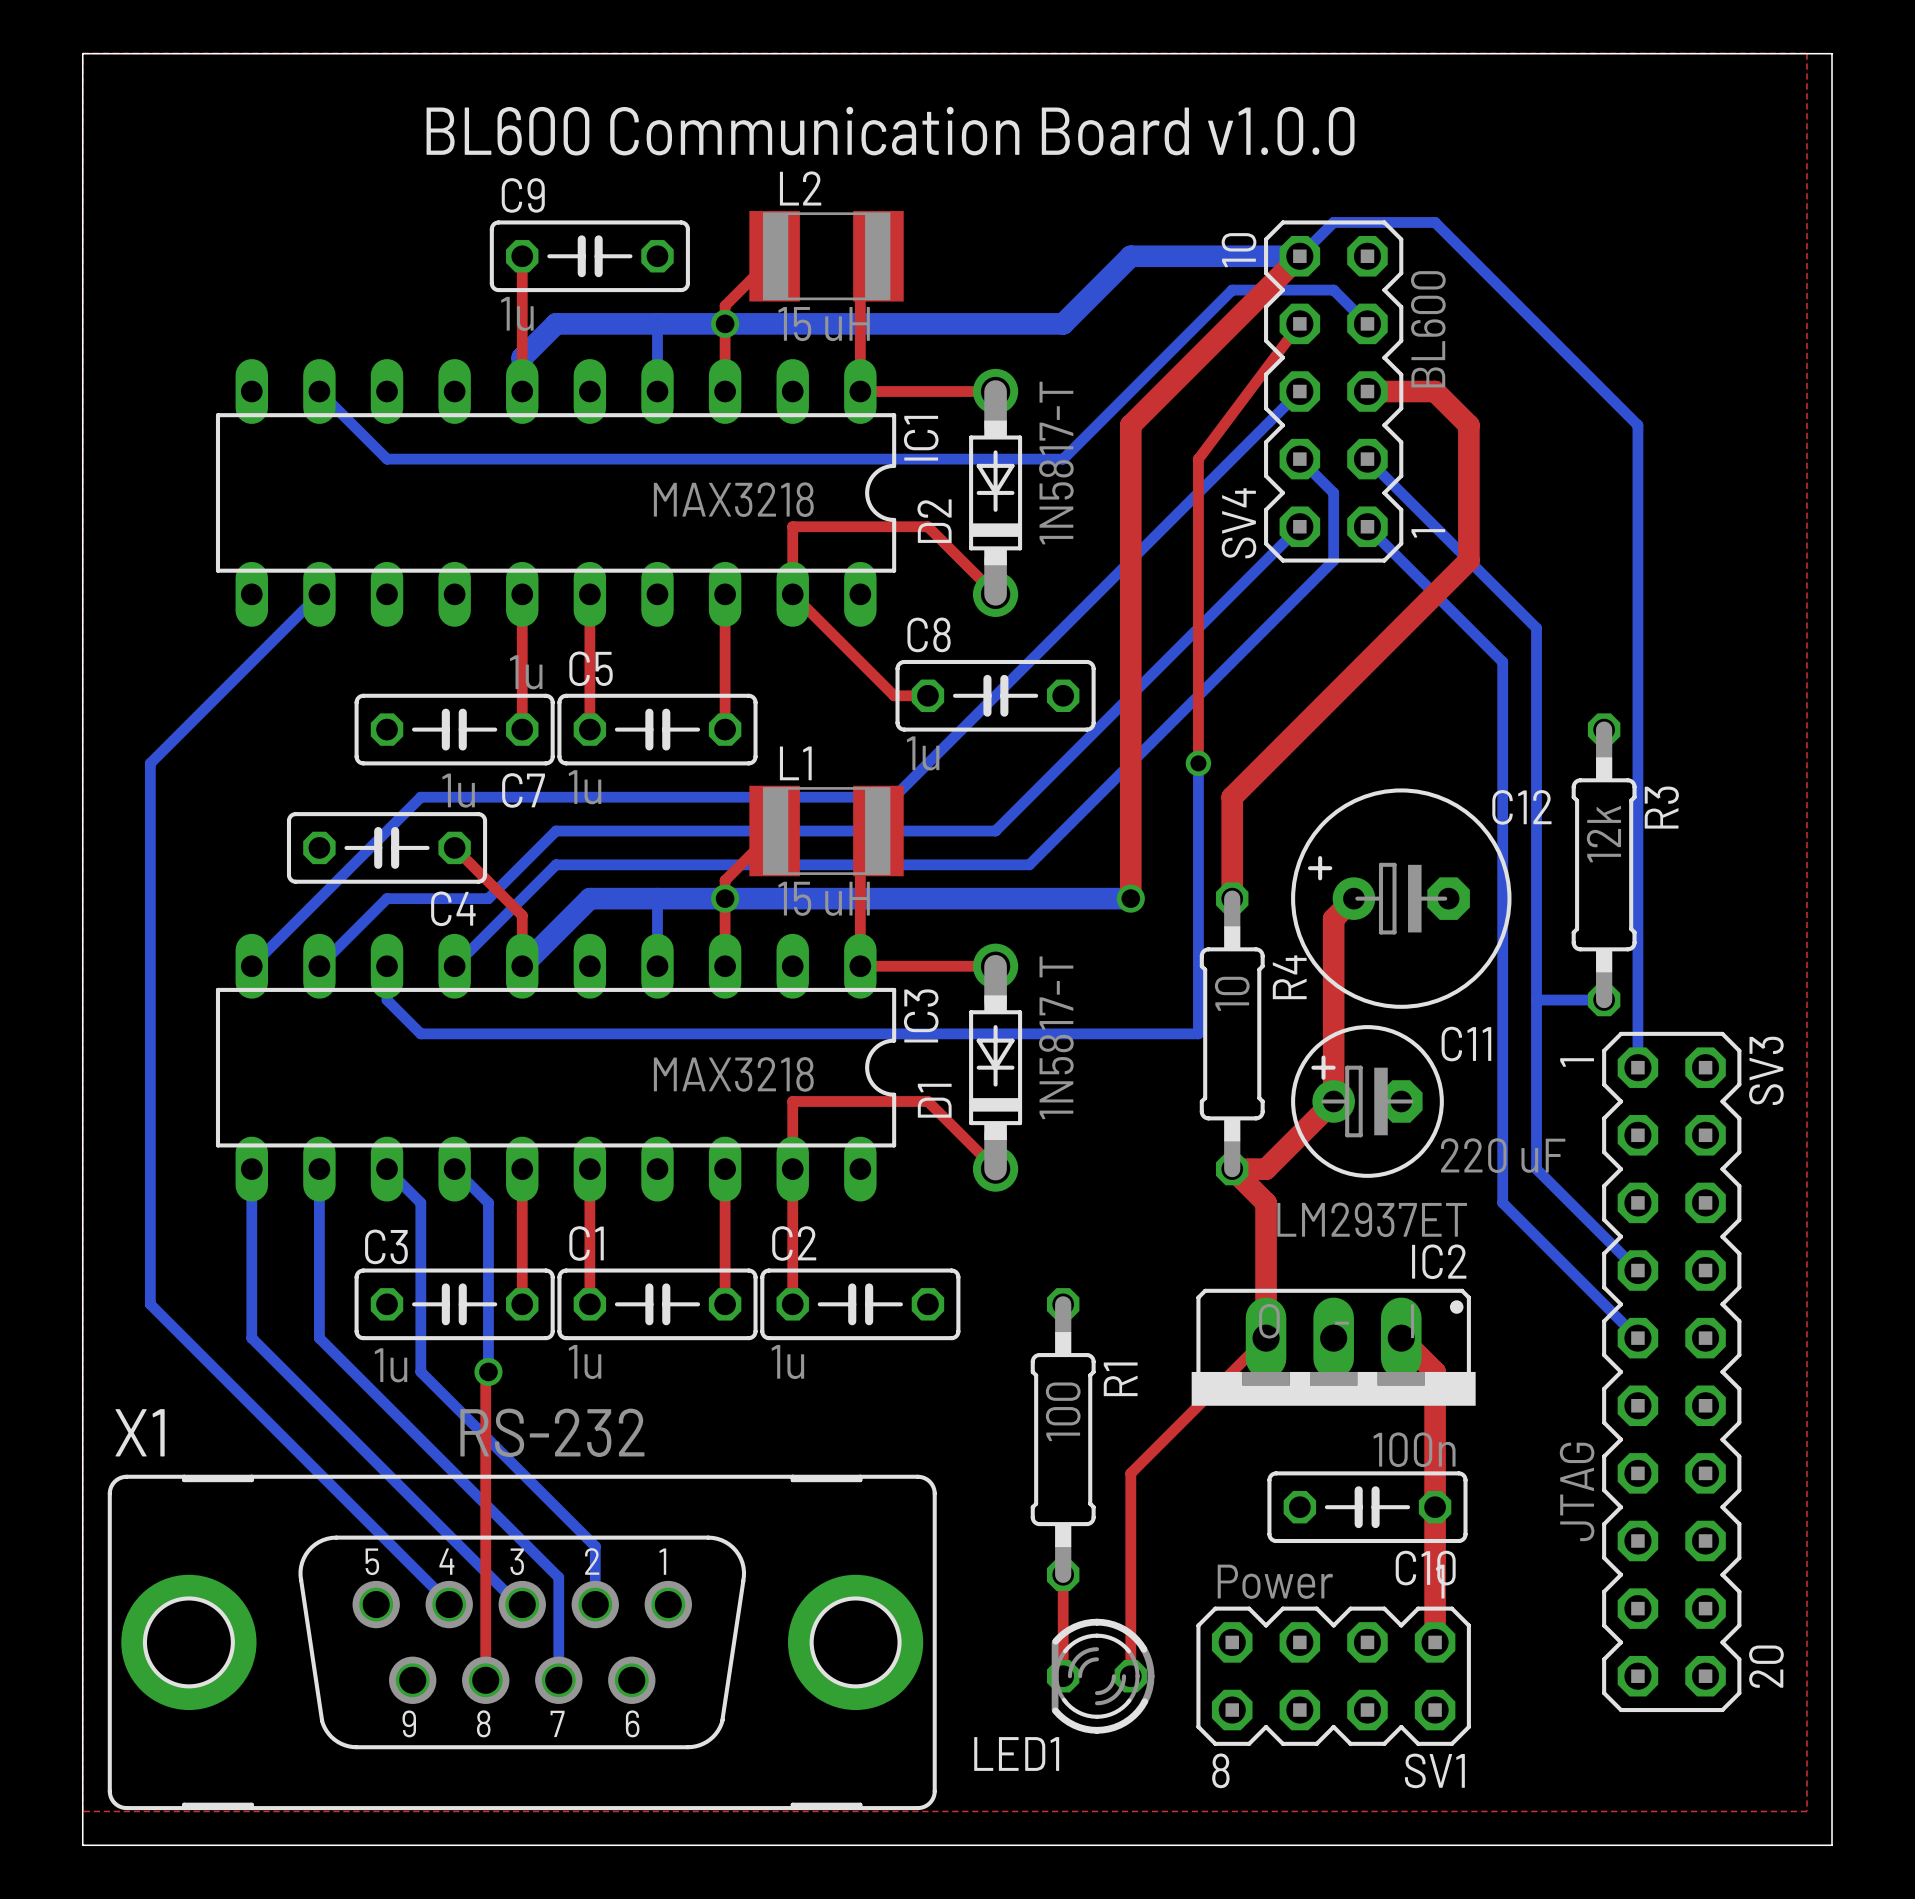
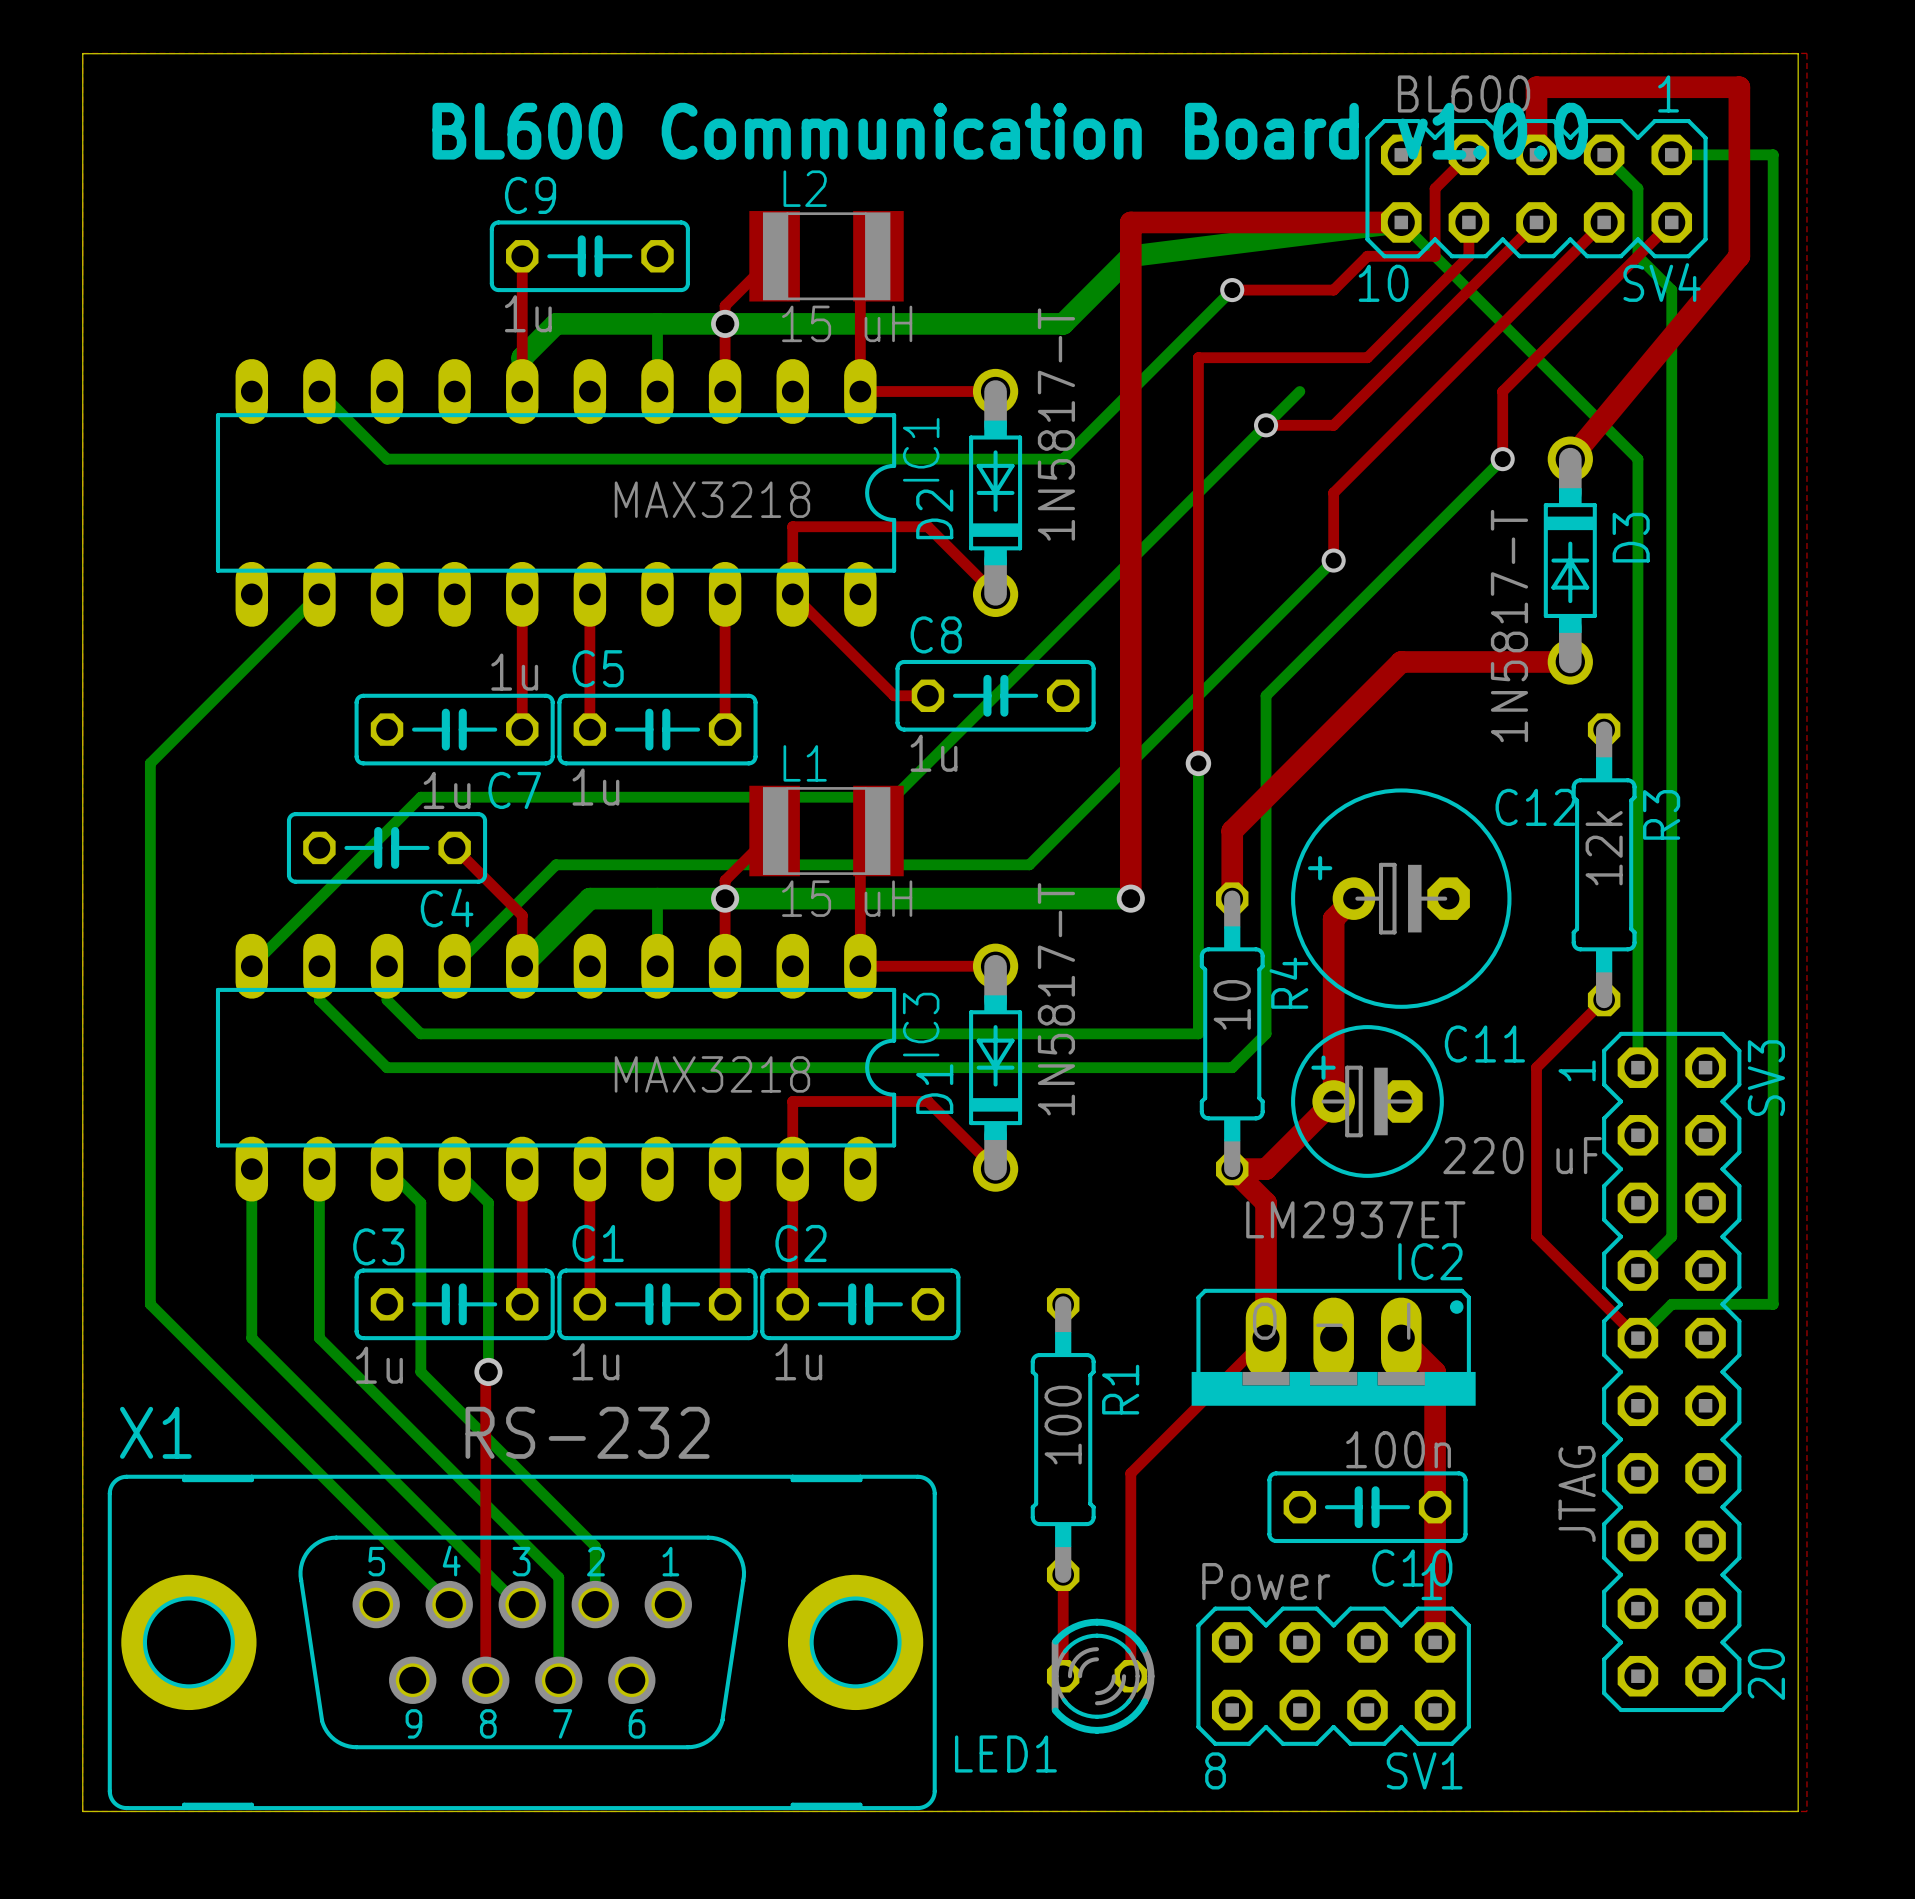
board edge: (1798, 53) (1832, 53) (1832, 1845) (82, 1845) (82, 1811) -> (1798, 53) (1798, 1811) (82, 1811)
top track: none -> (1468, 154) (1435, 188) (1435, 256) (1367, 256) (1333, 290) (1232, 290)
top track: none -> (1536, 154) (1536, 87) (1739, 87) (1739, 256) (1570, 459)
SV4 footprint: [1264, 220, 1404, 563] -> [1365, 119, 1708, 259]
bottom track: (1333, 222) (1299, 256) (1130, 256) -> none
bottom track: (1401, 222) (1435, 222) (1637, 425) (1637, 459) -> (1130, 256) (1401, 222) (1637, 459)
top track: none -> (1536, 222) (1333, 425) (1266, 425)
top track: none -> (1604, 222) (1333, 492) (1333, 560)
top track: none -> (1671, 222) (1502, 391) (1502, 459)
top track: (1299, 256) (1130, 425) -> (1401, 222) (1130, 222) (1130, 425)
bottom track: (1232, 290) (1333, 290) (1367, 323) -> none
via: none -> (1232, 290)
top track: (1299, 323) (1198, 459) -> (1468, 222) (1468, 256) (1367, 357) (1198, 357) (1198, 459)
SV4 value position: BL600 (1428, 329) -> BL600 (1464, 93)
top track: (1367, 391) (1435, 391) (1468, 425) (1468, 560) (1232, 797) (1232, 831) -> (1570, 661) (1401, 661) (1232, 831)
via: none -> (1266, 425)
bottom track: (1299, 459) (1333, 492) (1333, 560) -> none
bottom track: (1367, 459) (1536, 628) (1536, 1169) (1637, 1270) -> (1604, 154) (1637, 188) (1637, 256) (1671, 290) (1671, 1236) (1637, 1270)
via: none -> (1502, 459)
SV4 name position: SV4 (1238, 523) -> SV4 (1662, 282)
bottom track: (1299, 526) (995, 831) (556, 831) (488, 898) (387, 898) (319, 966) -> (1502, 459) (1266, 695) (1266, 1033) (1232, 1067) (387, 1067) (319, 1000) (319, 966)
bottom track: (1367, 526) (1502, 661) (1502, 1202) (1637, 1338) -> (1671, 154) (1773, 154) (1773, 1304) (1671, 1304) (1637, 1338)
via: none -> (1333, 560)
D3: none -> 1N5817-T (1570, 560)
bottom track: (1536, 1000) (1604, 1000) -> none
top track: none -> (1604, 1000) (1536, 1067) (1536, 1236) (1637, 1338)

